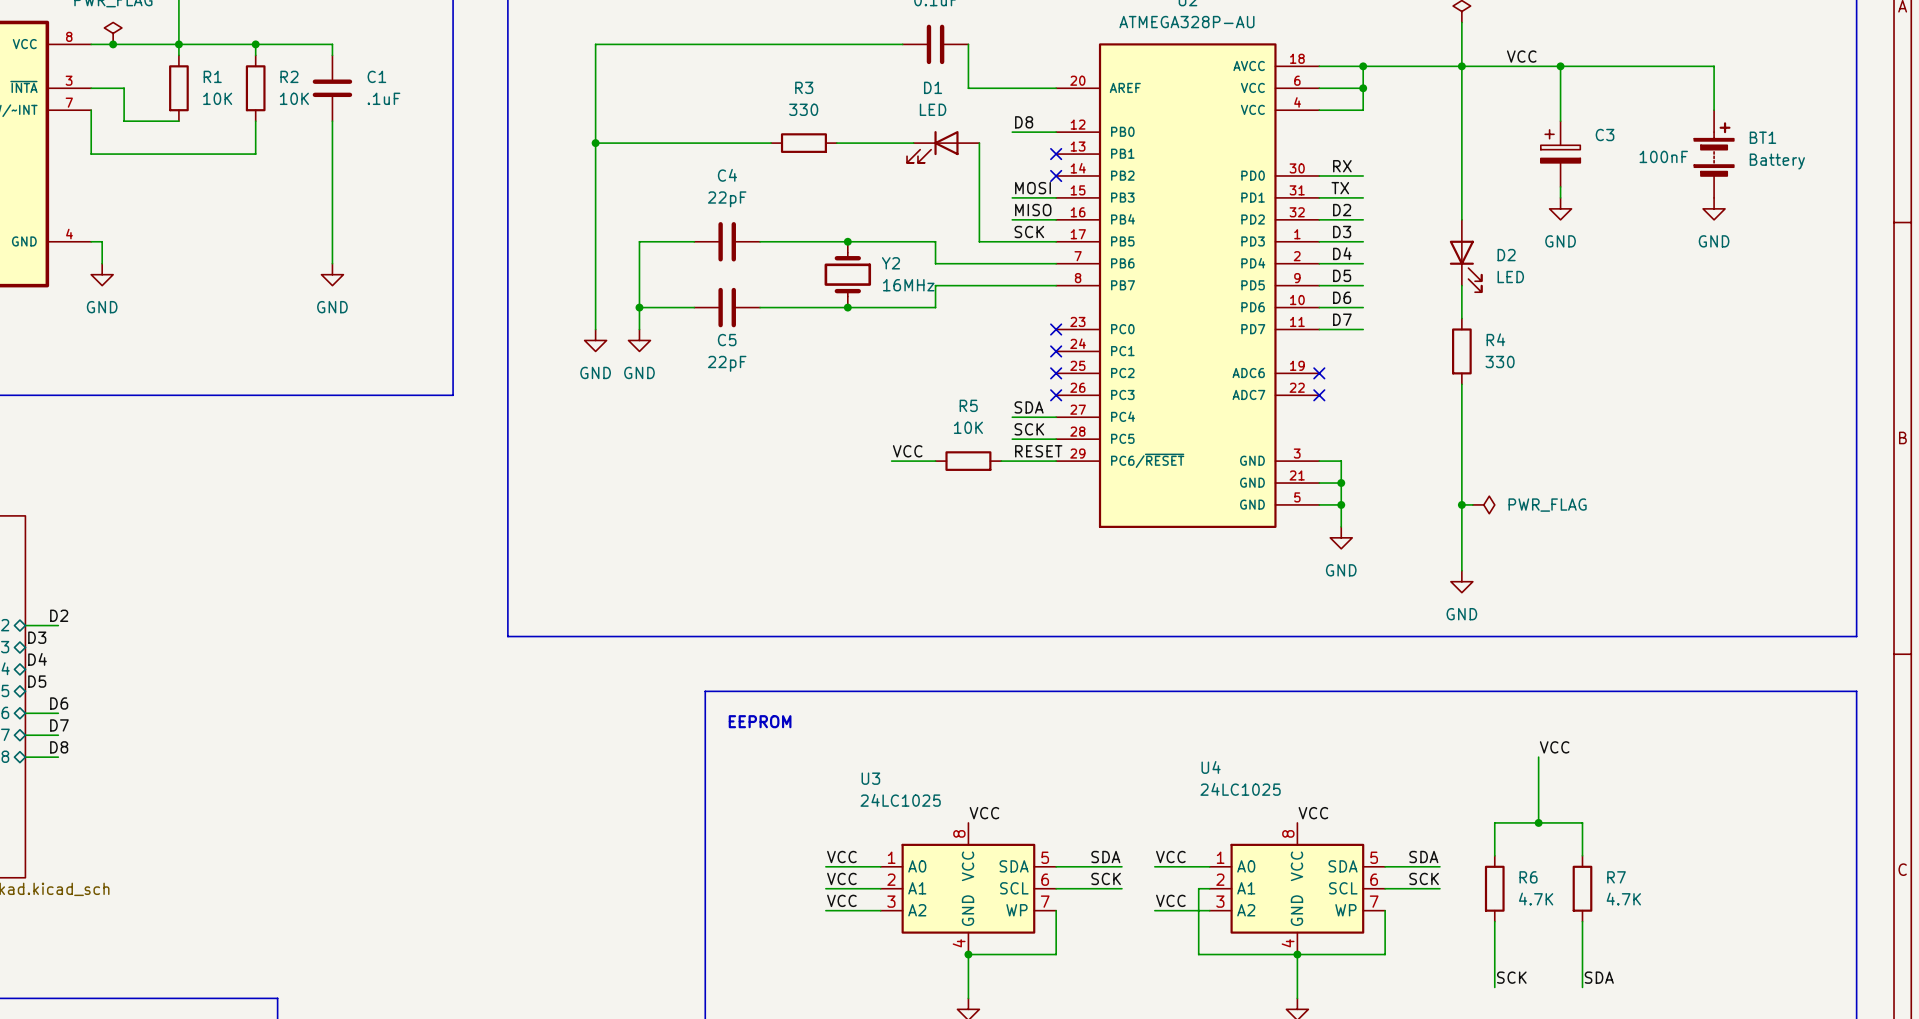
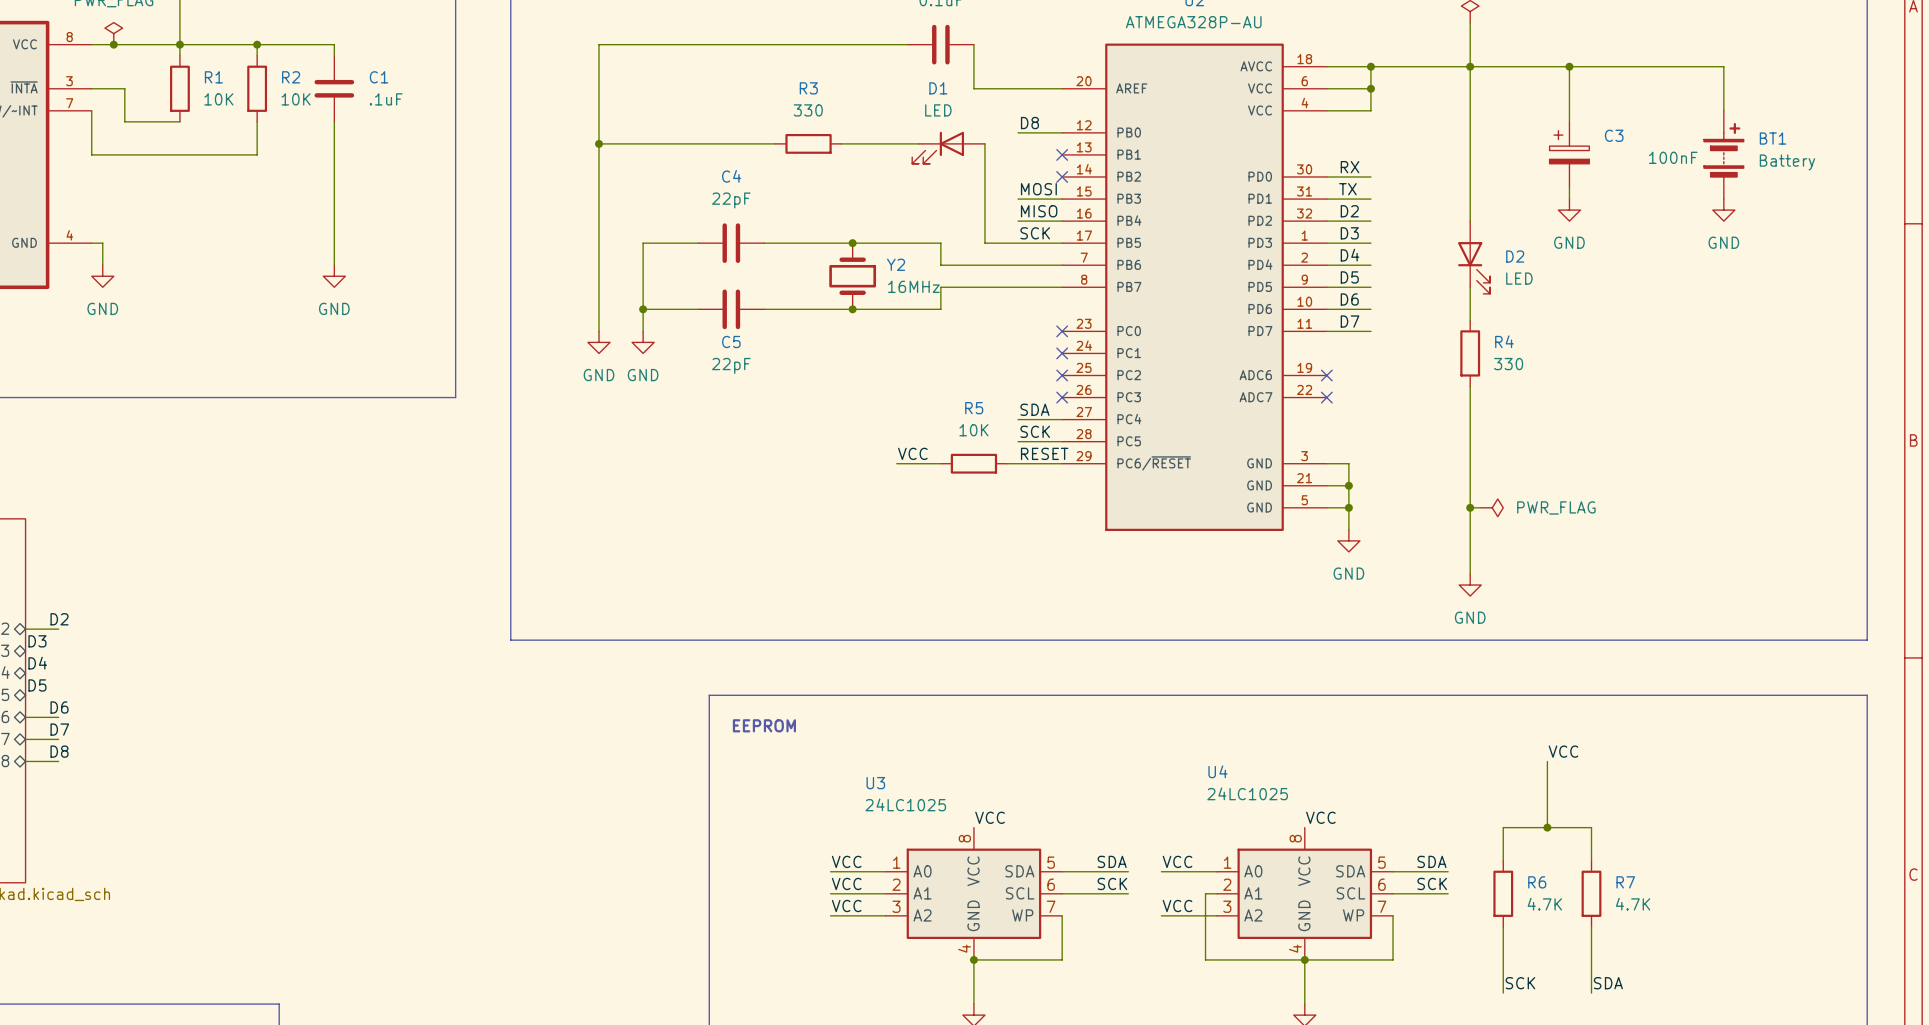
label: VCC (1521, 56) -> none

